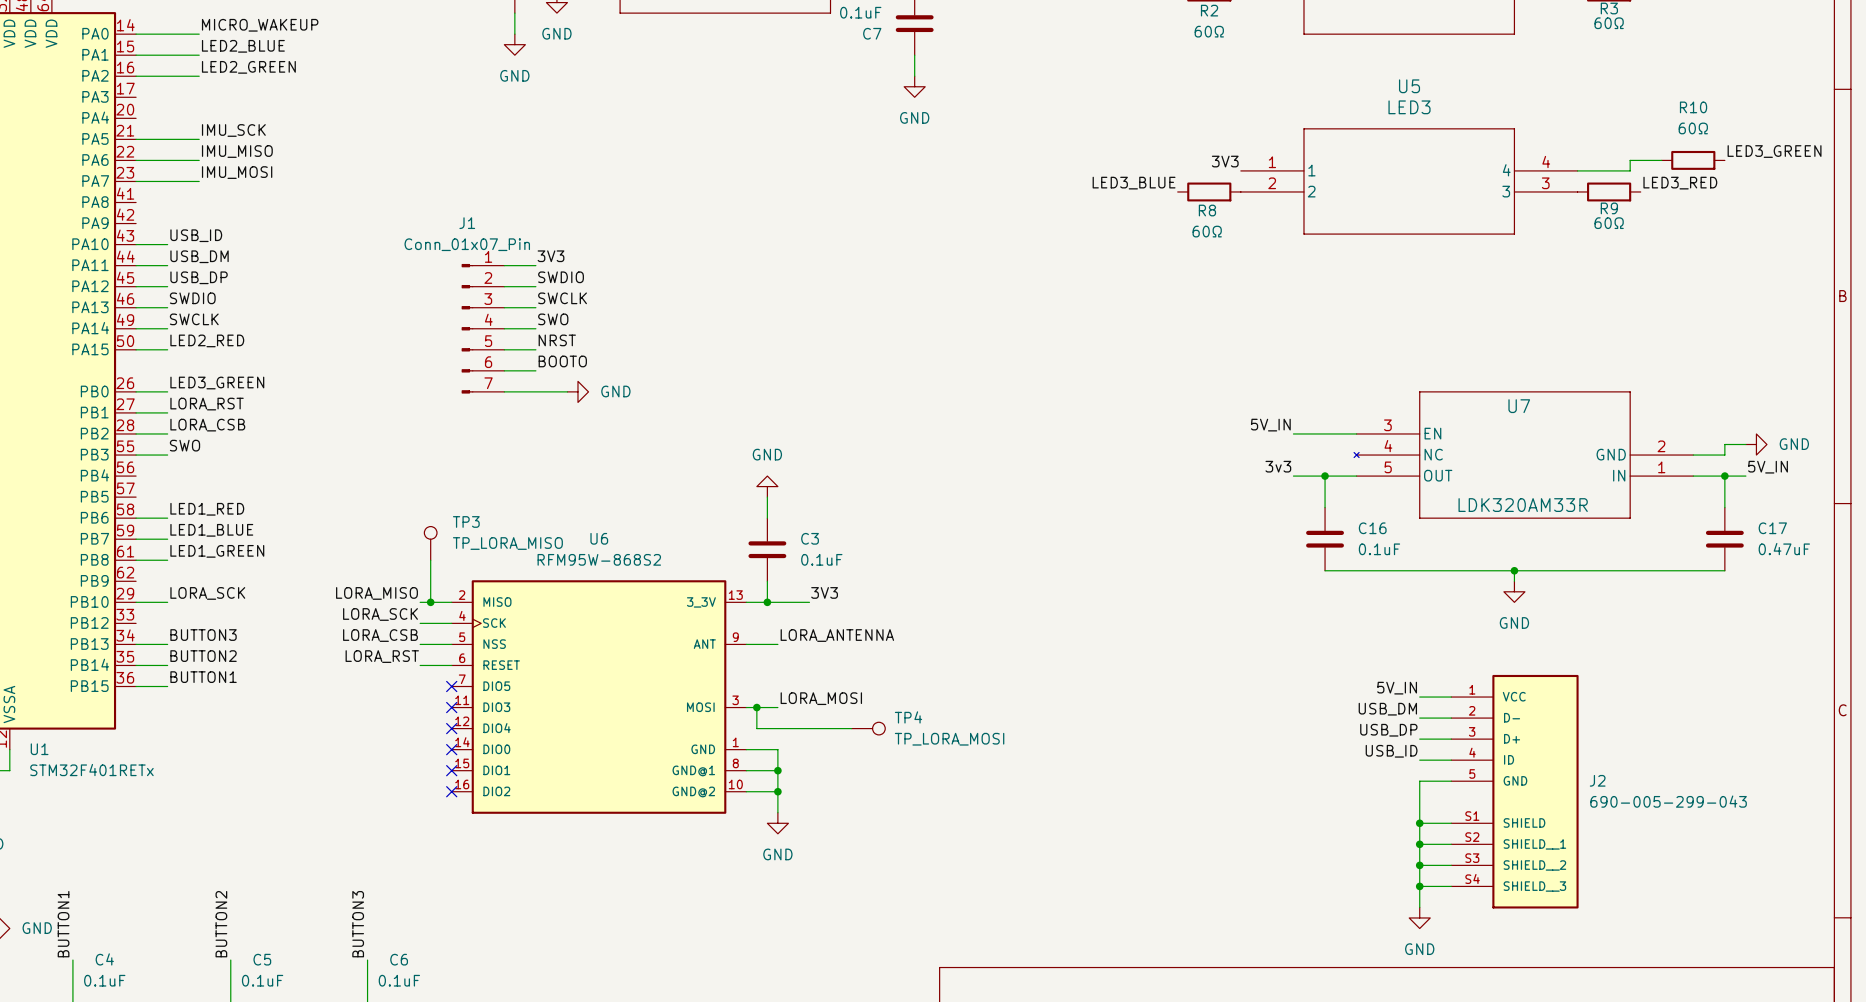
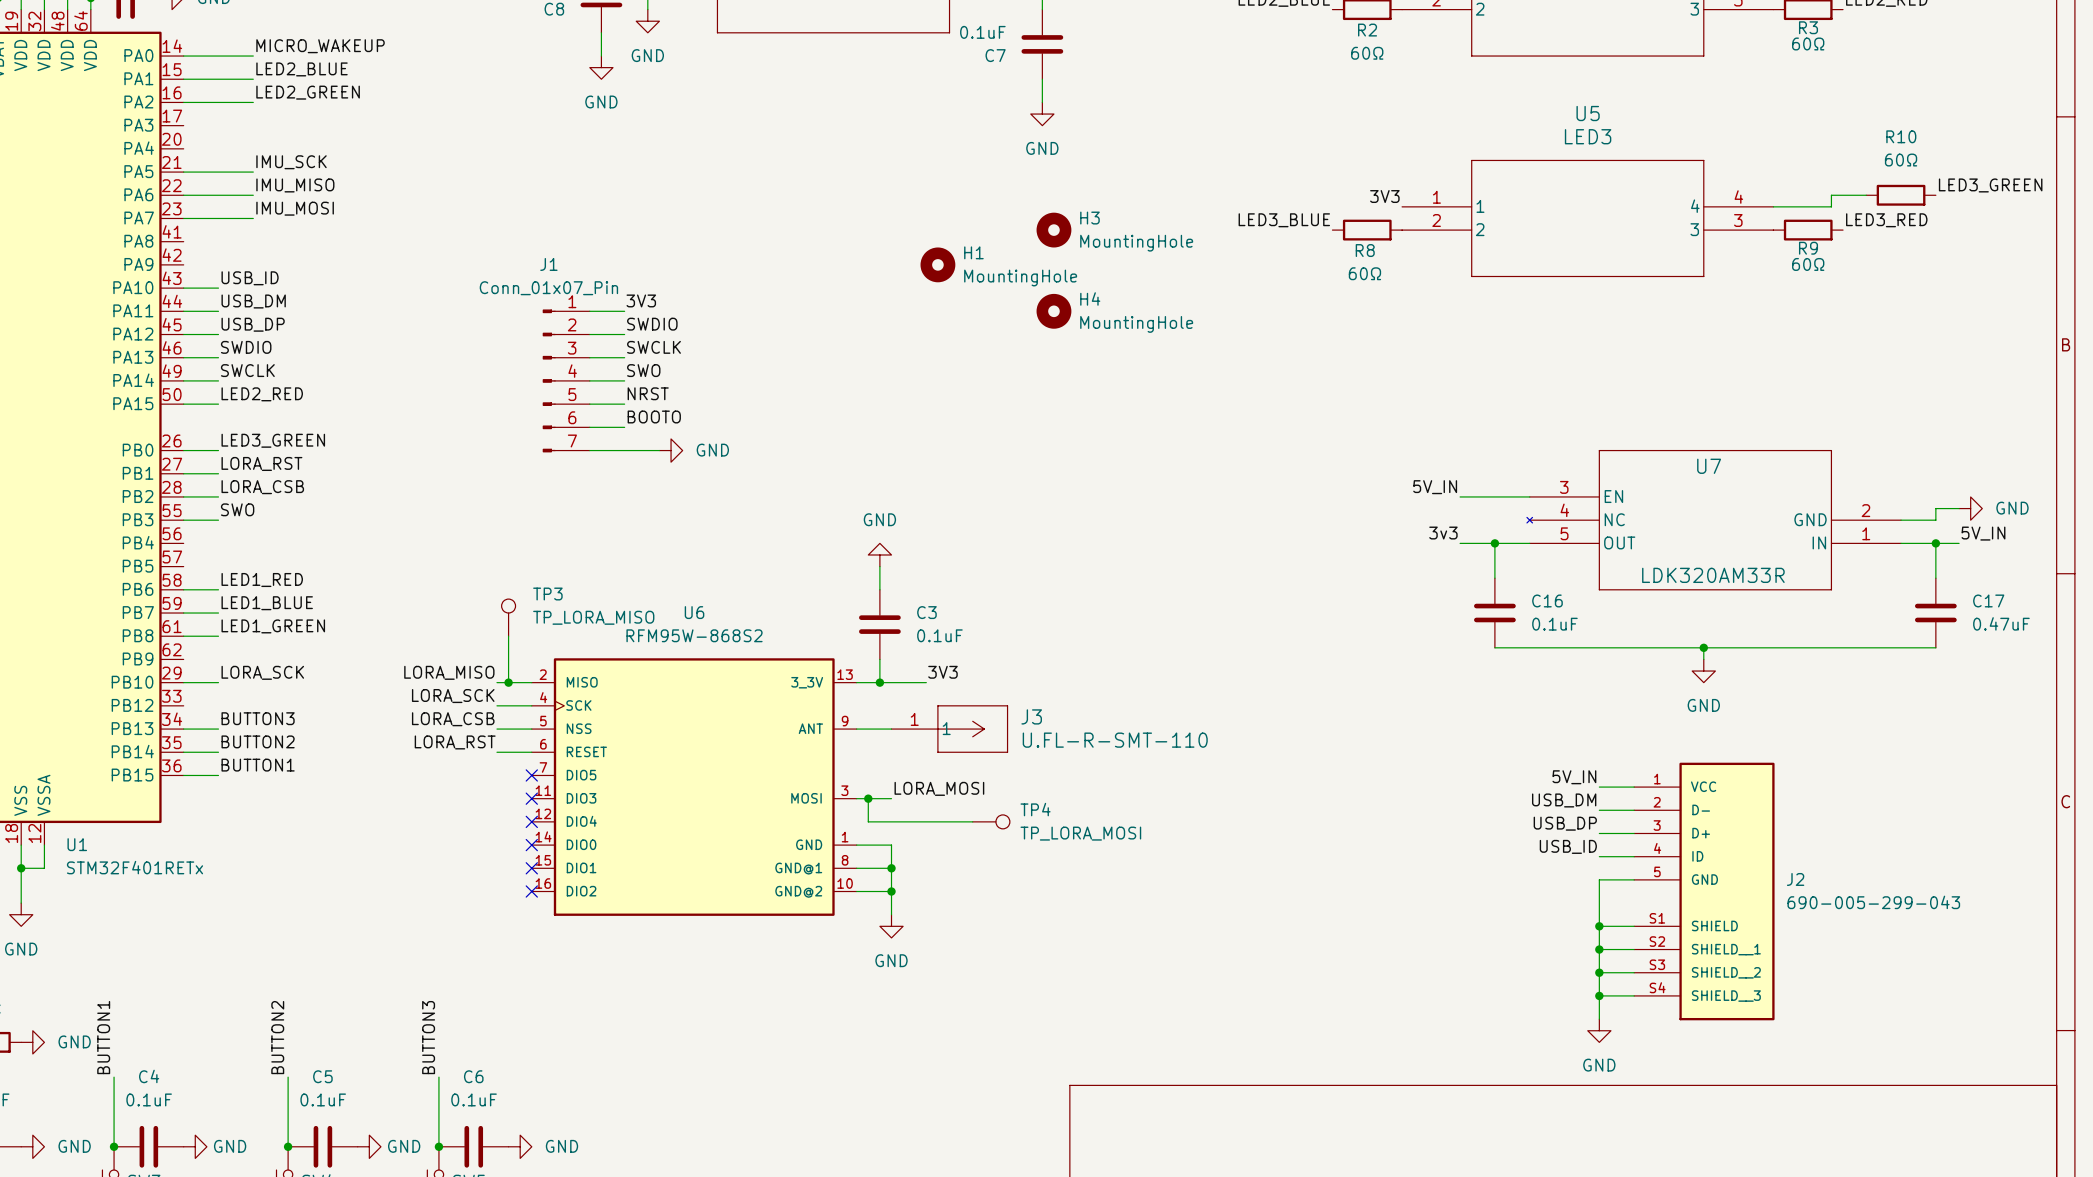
H3: none -> MountingHole (1053, 230)
H1: none -> MountingHole (937, 264)
H4: none -> MountingHole (1053, 311)
label: LORA_ANTENNA (837, 635) -> none
J3: none -> U.FL-R-SMT-110 (949, 729)

